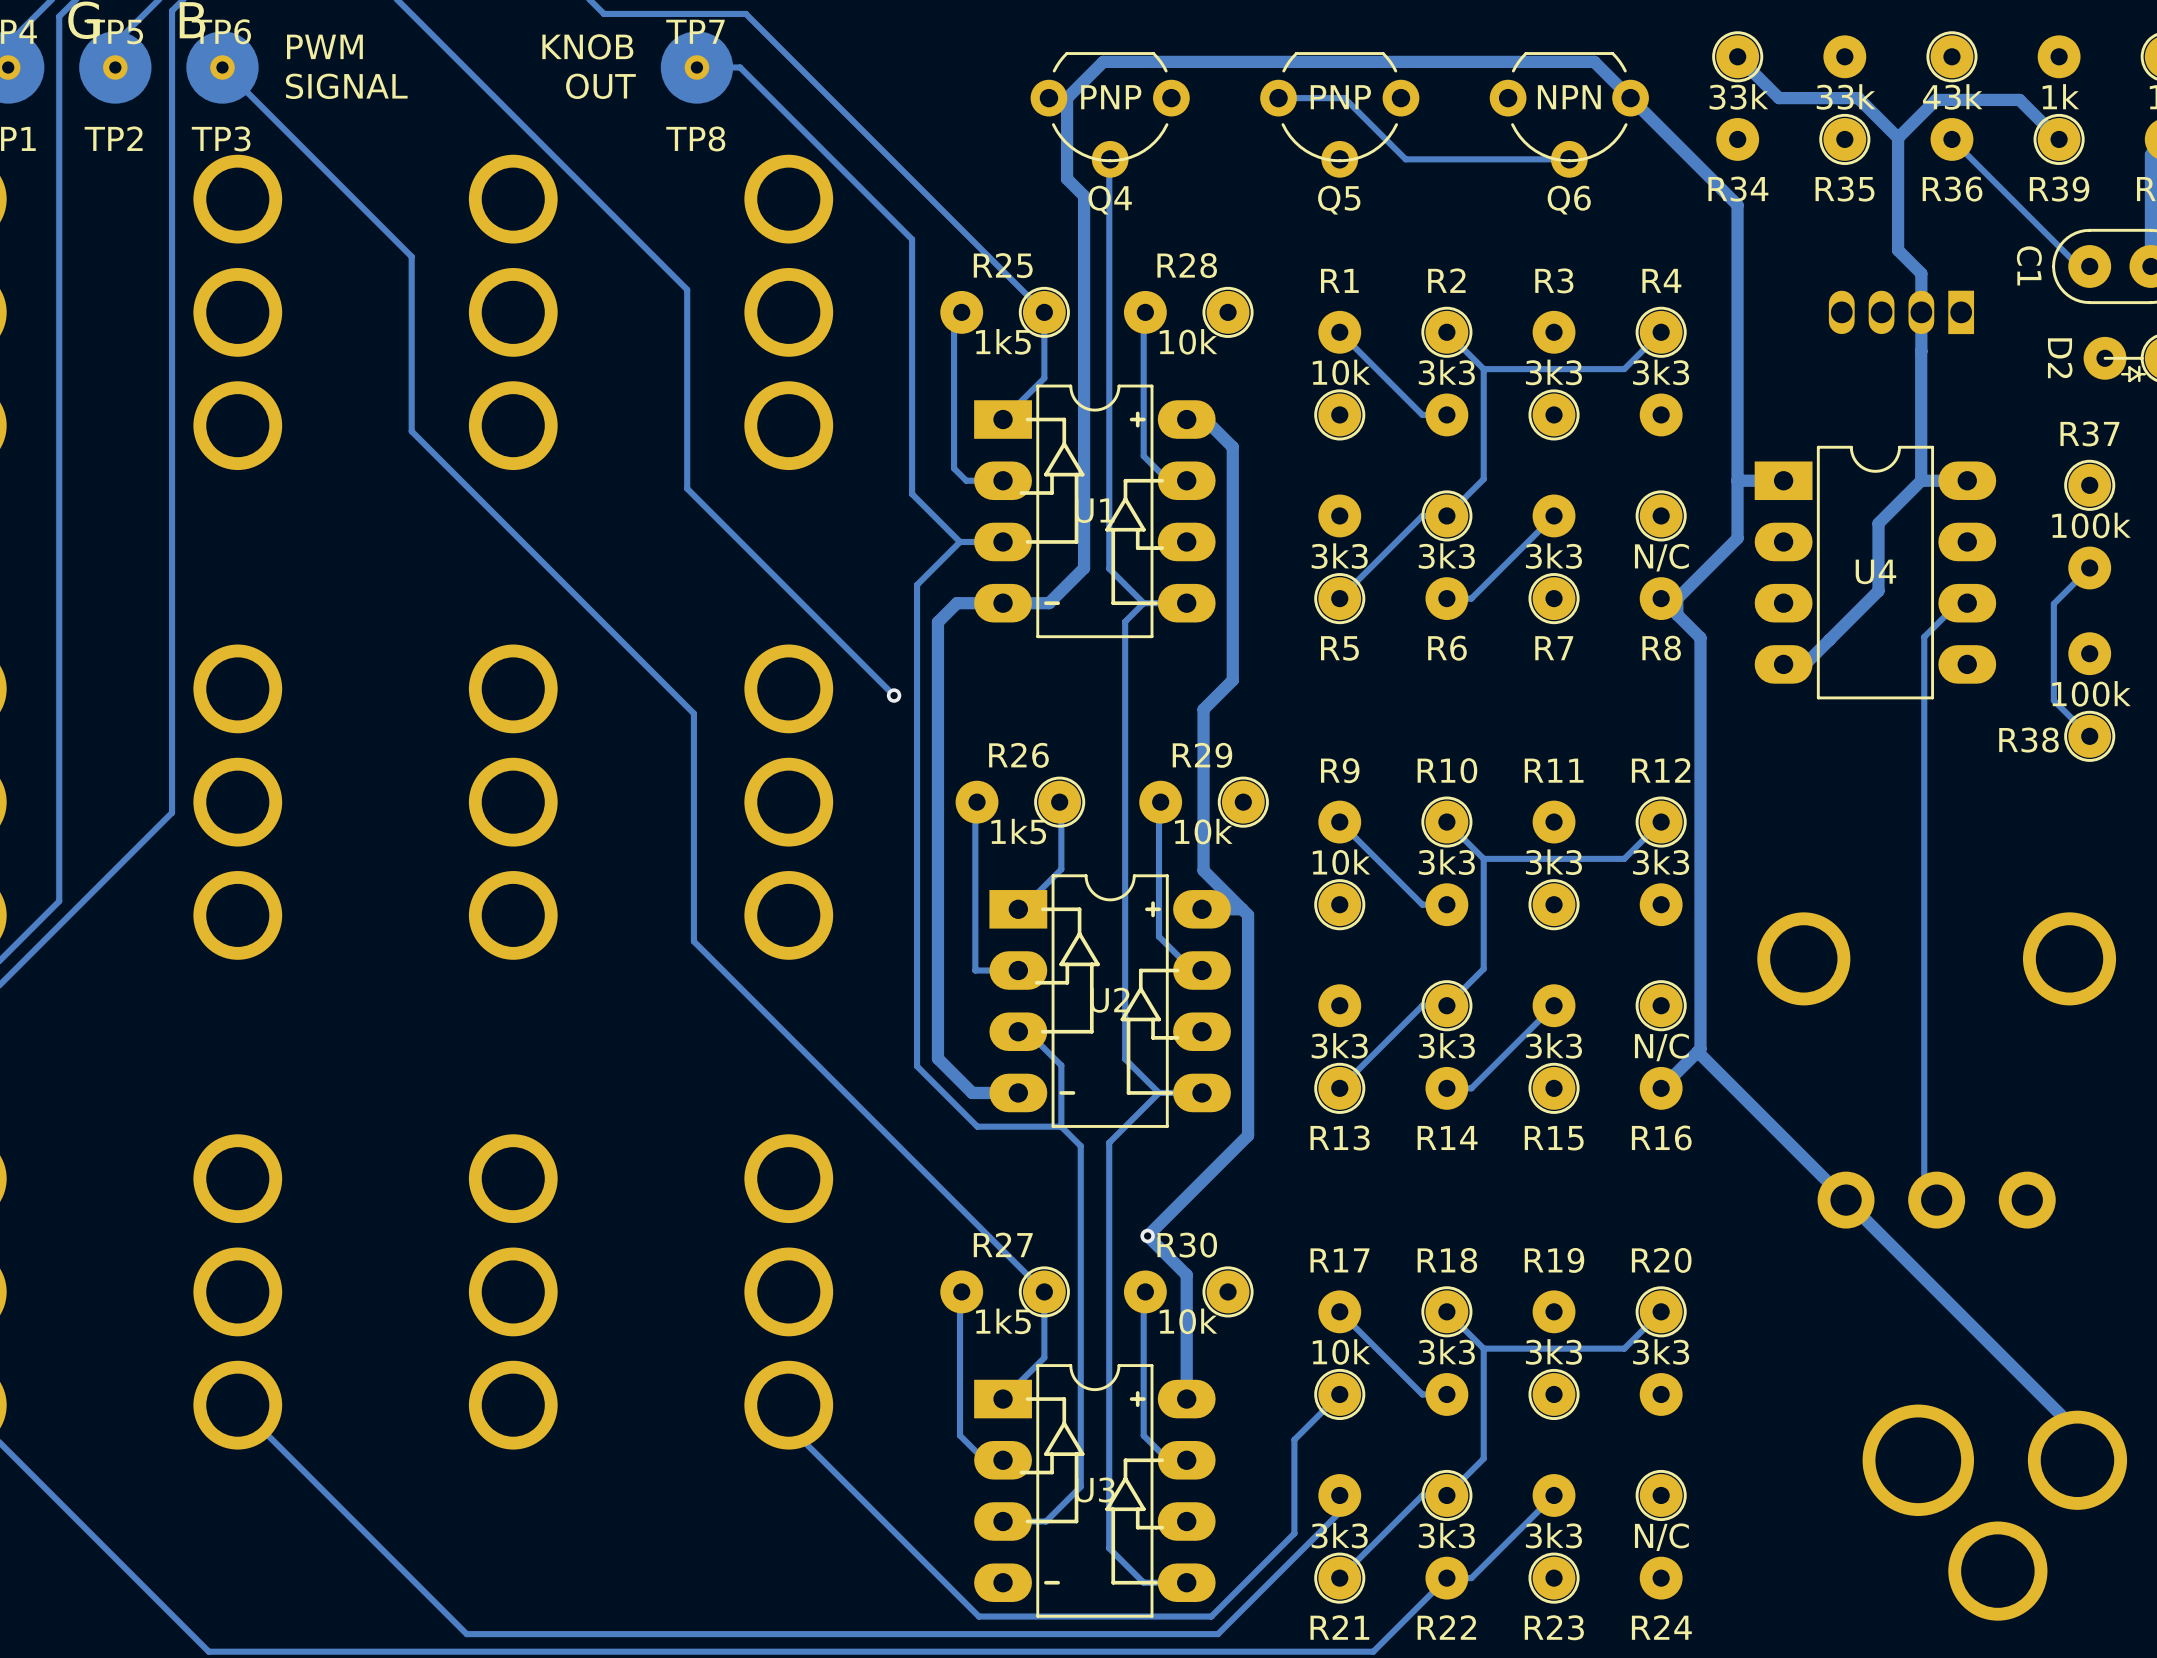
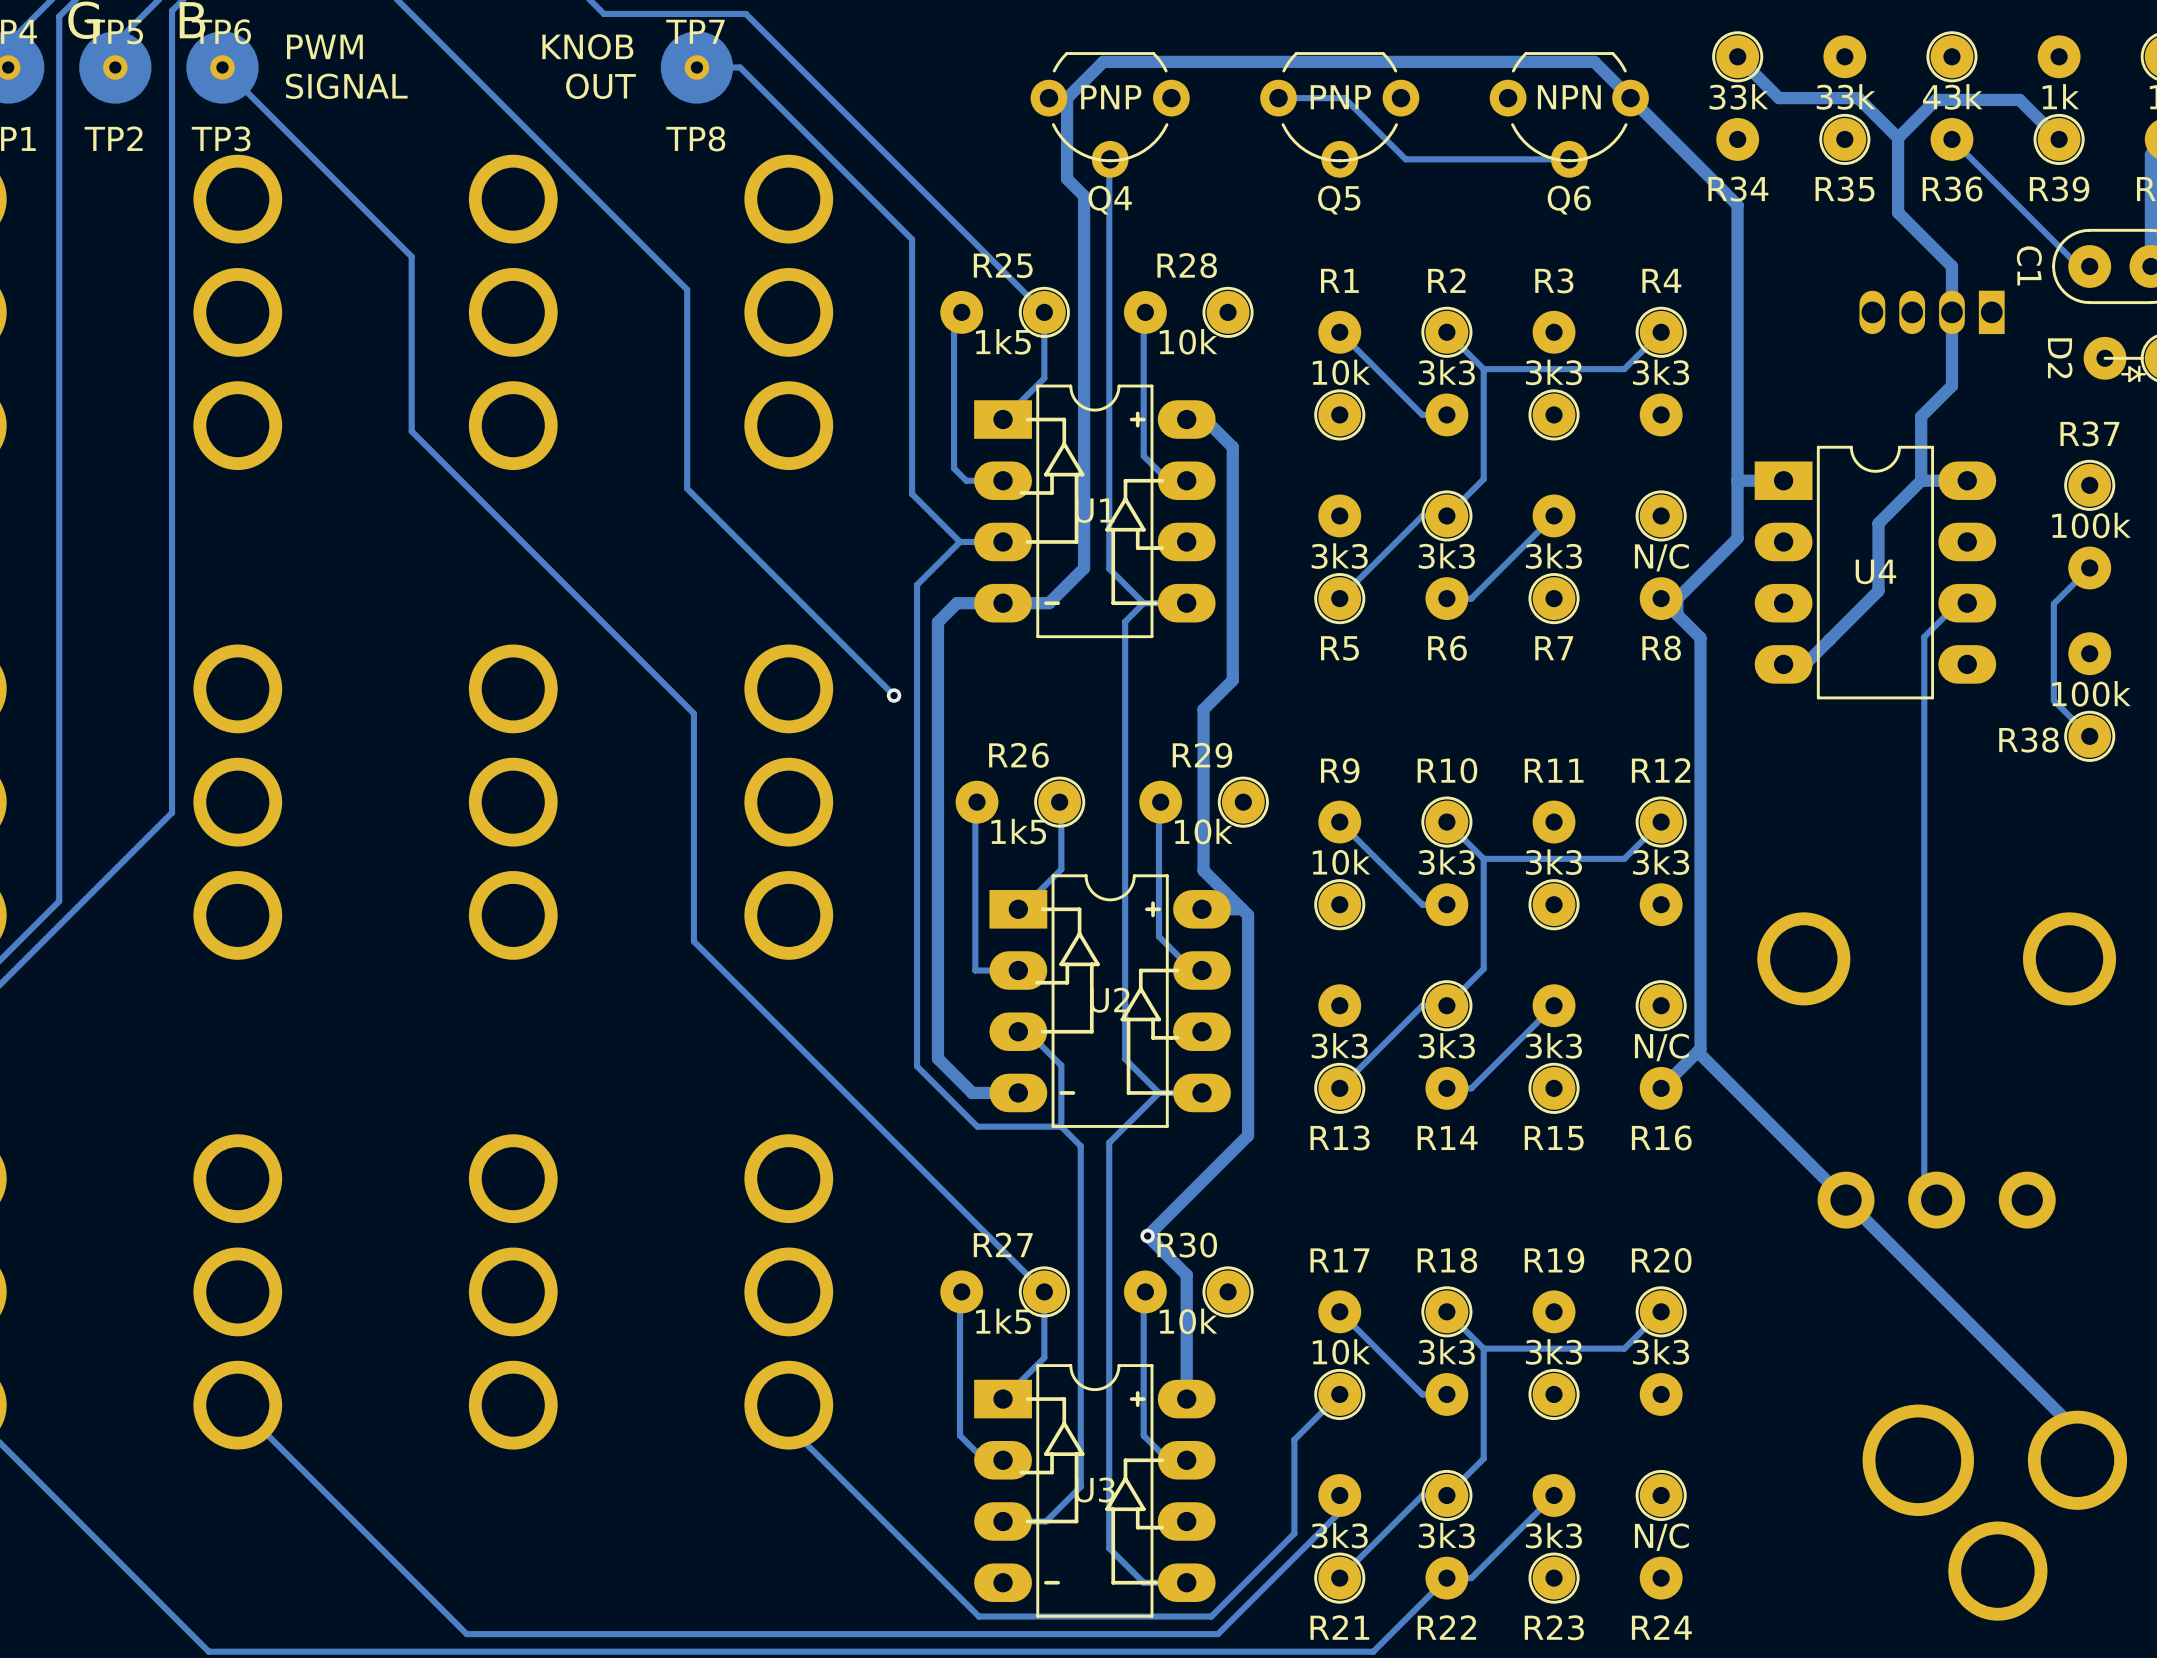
track: (1898, 212) (1898, 250) (1921, 273) (1921, 351) -> (1898, 212) (1951, 266) (1951, 385) (1921, 416)
part position: (1901, 312) -> (1932, 312)
track: (1921, 351) (1921, 416) -> none

